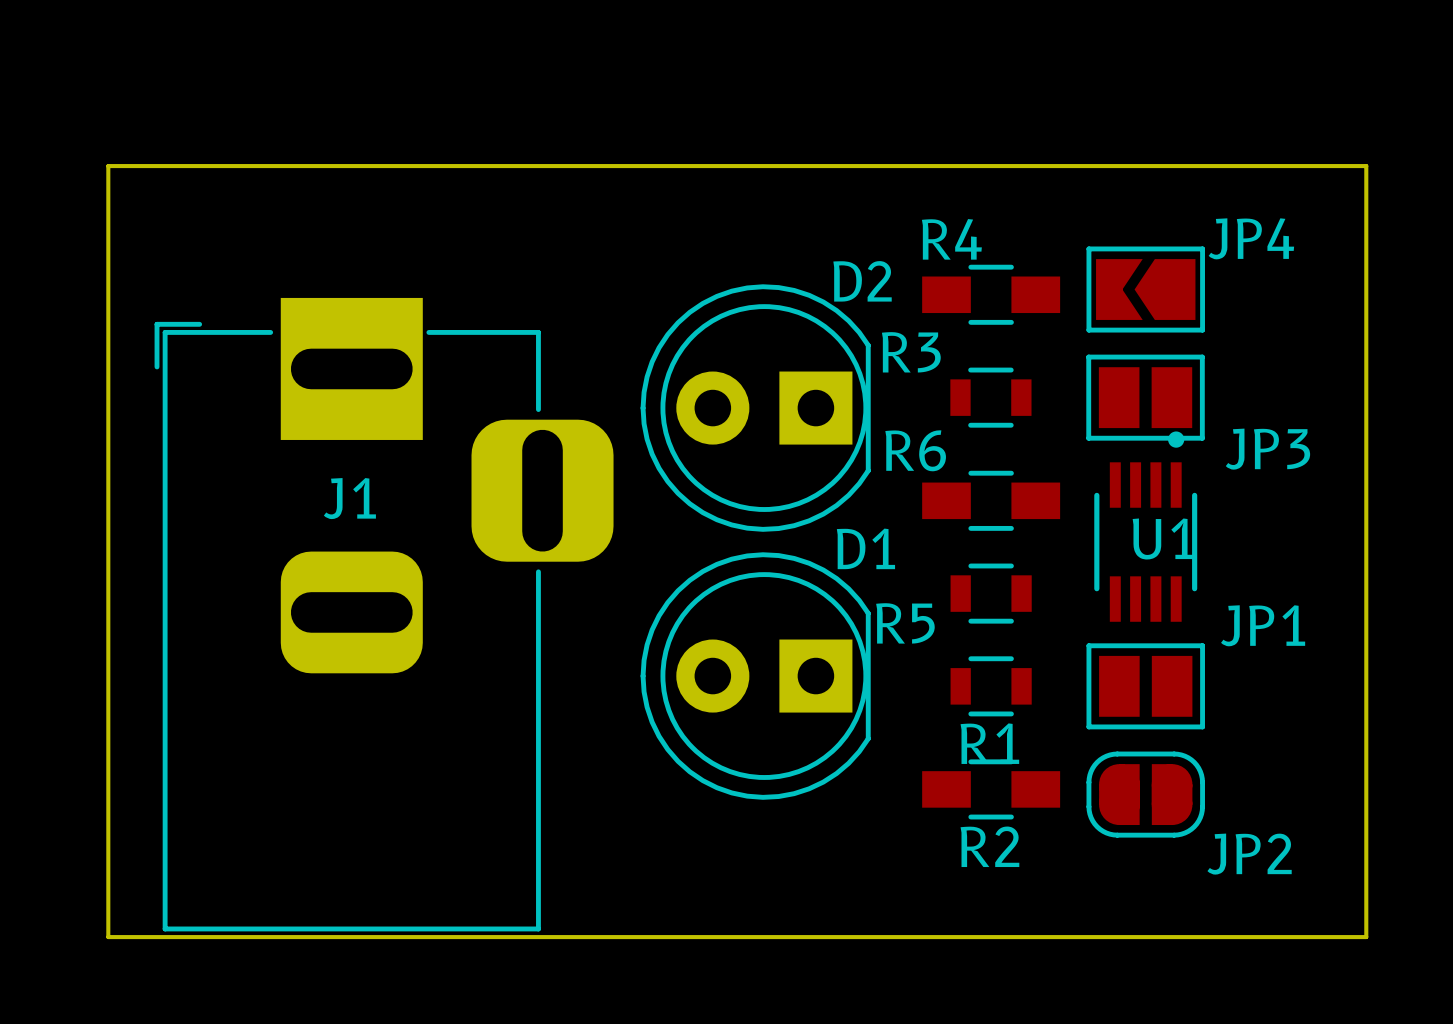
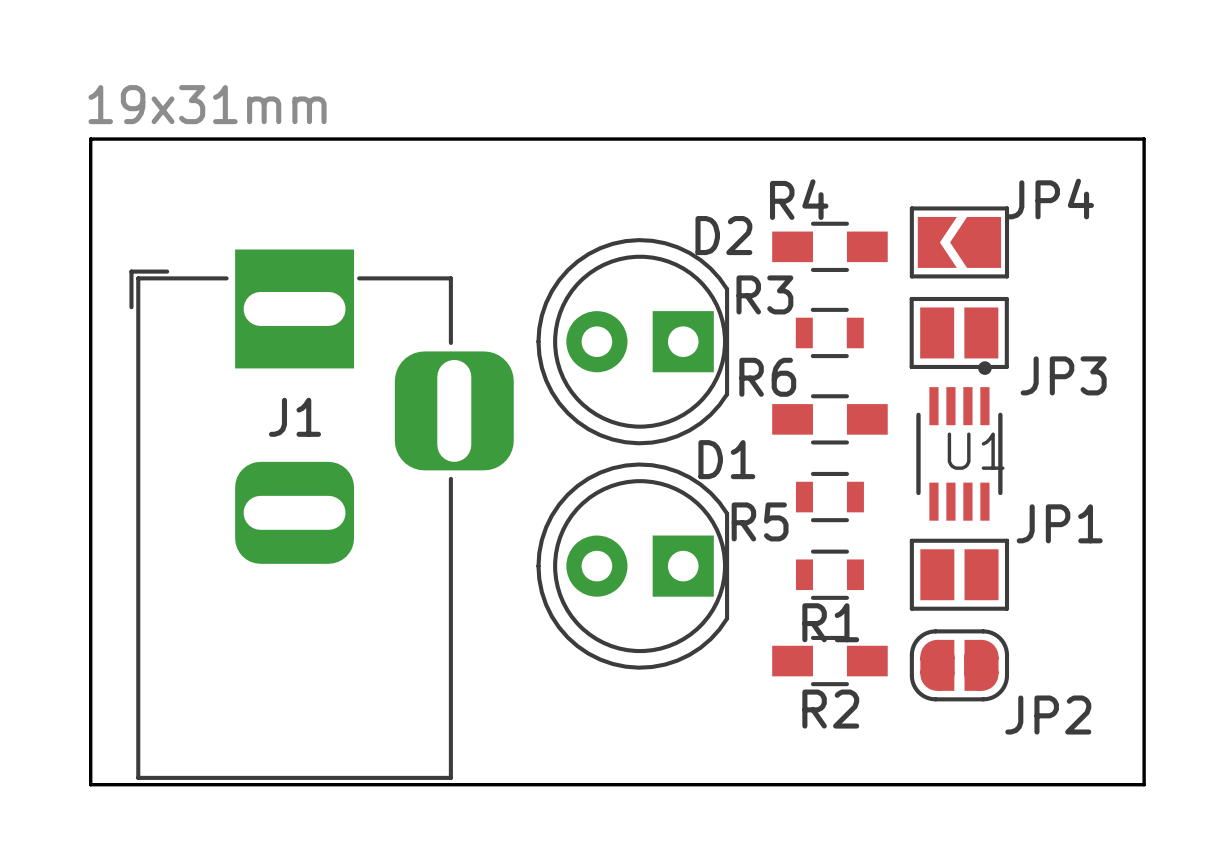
text: none -> 19x31mm (207, 104)

